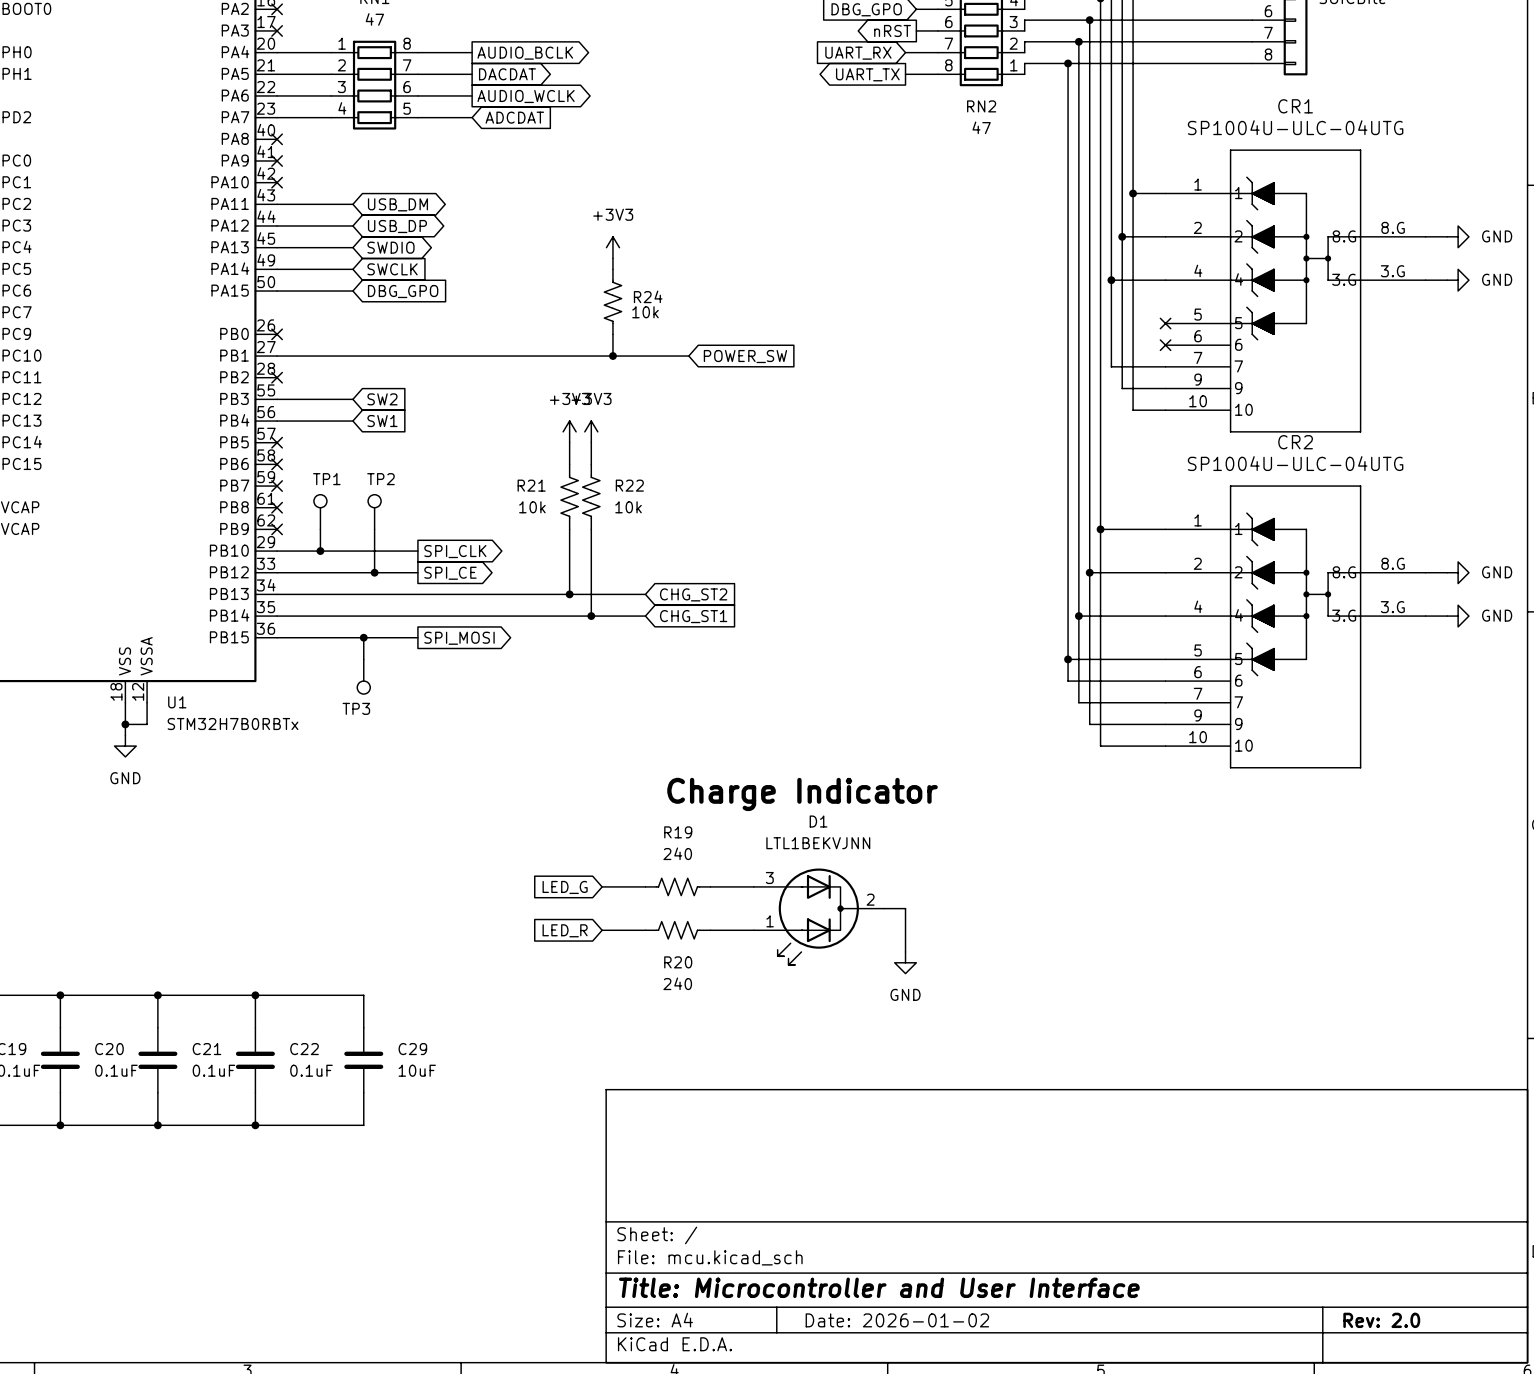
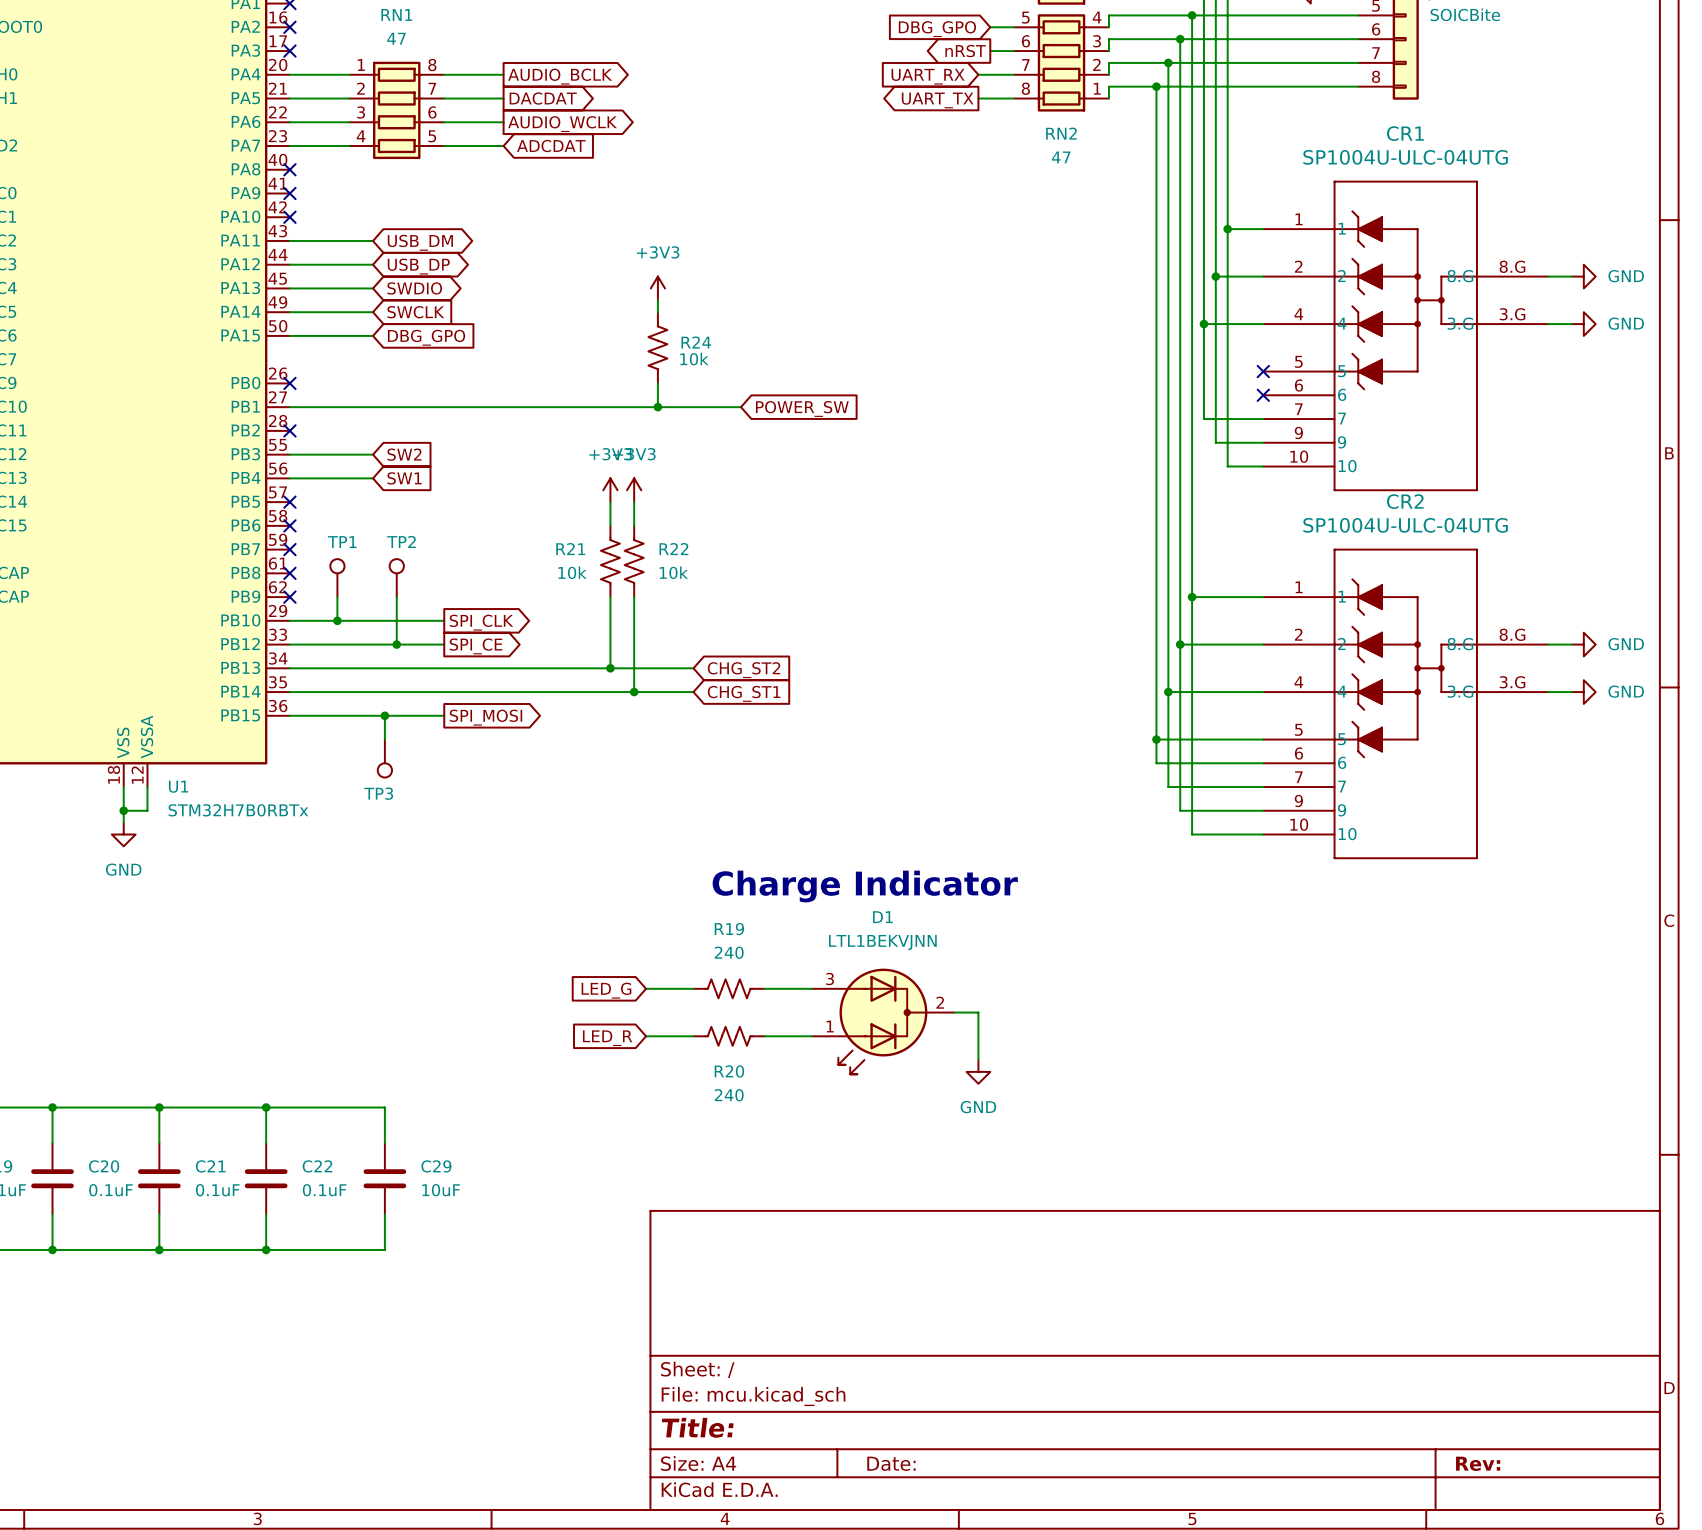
title block: Title: Microcontroller and User Interface (879, 1287) -> Title: (697, 1427)
title block: Date: 2026-01-02 (897, 1320) -> Date: (891, 1463)
title block: Rev: 2.0 (1381, 1320) -> Rev: (1478, 1463)

